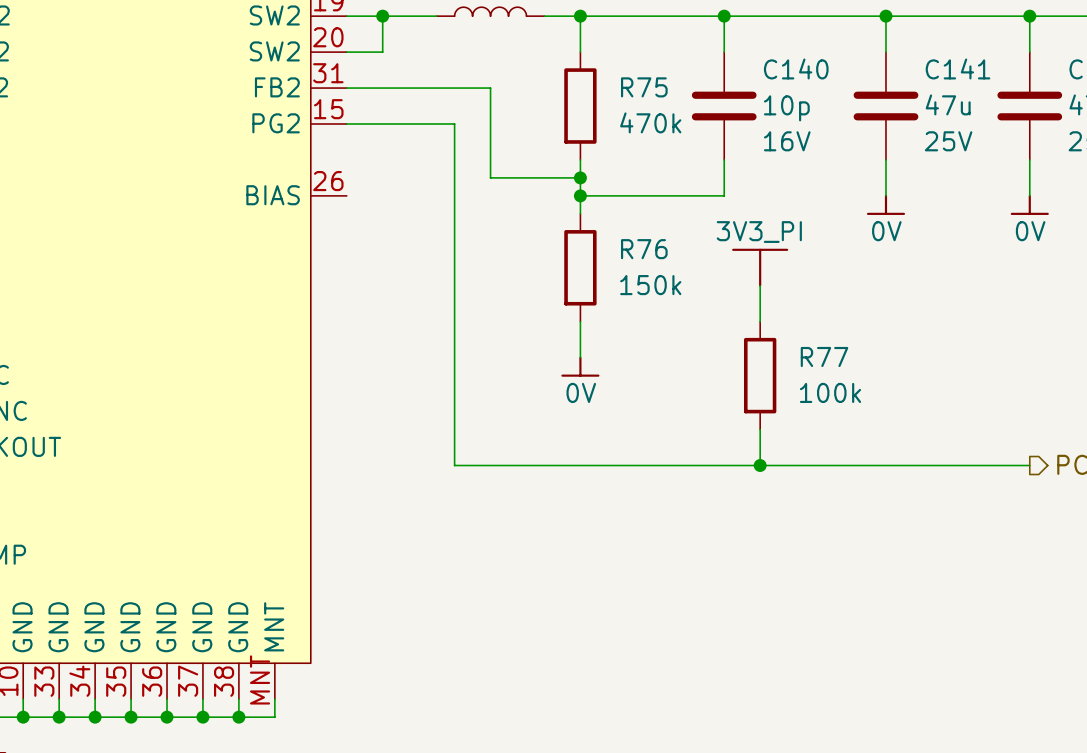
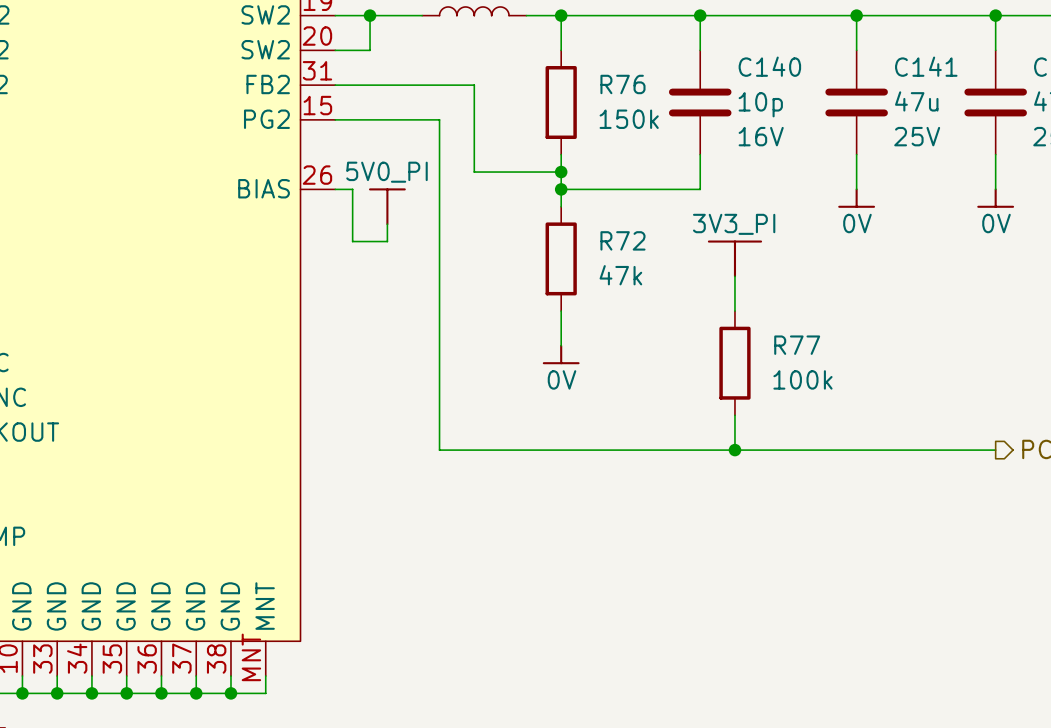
R75 name: R75 (644, 87) -> R76 (622, 84)
R75 value: 470k (650, 122) -> 150k (629, 119)
wire: none -> (335, 189) (352, 189) (352, 241) (387, 241) (387, 224)
power symbol: none -> 5V0_PI (387, 206)
R76 name: R76 (644, 249) -> R72 (622, 240)
R76 value: 150k (650, 285) -> 47k (620, 275)

